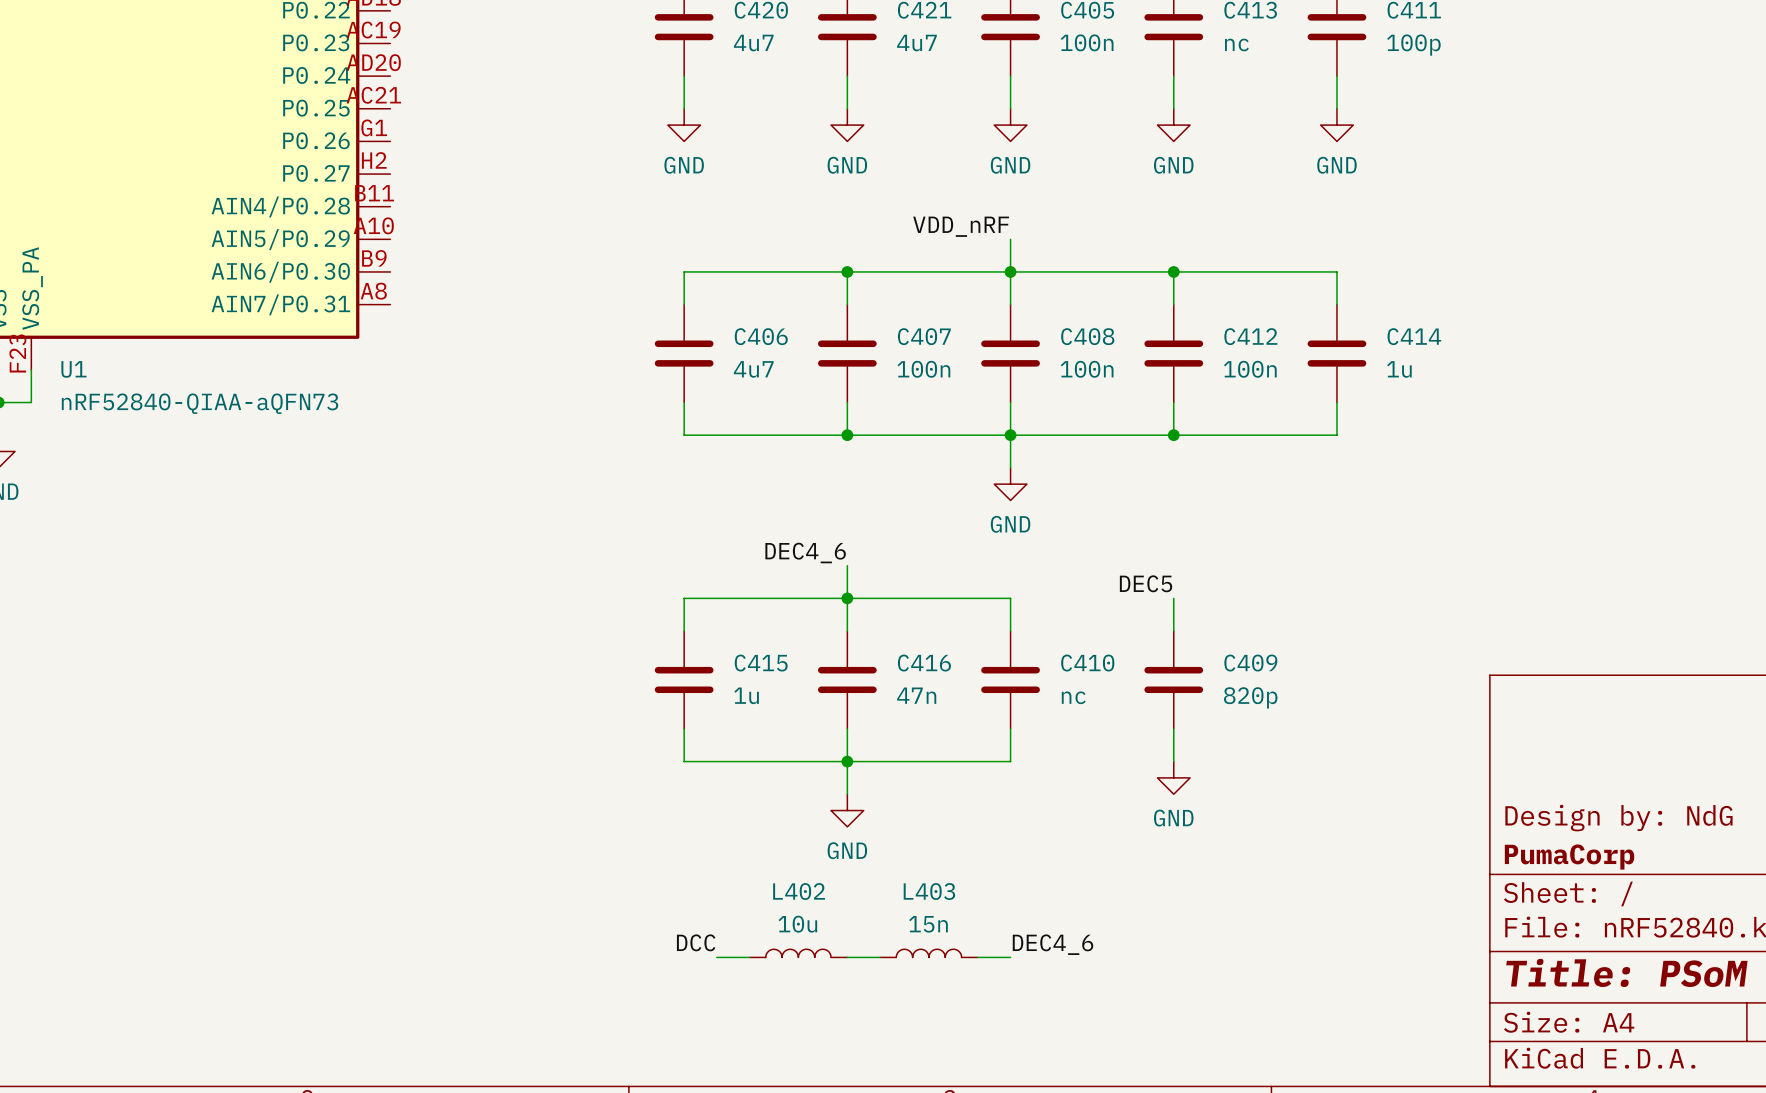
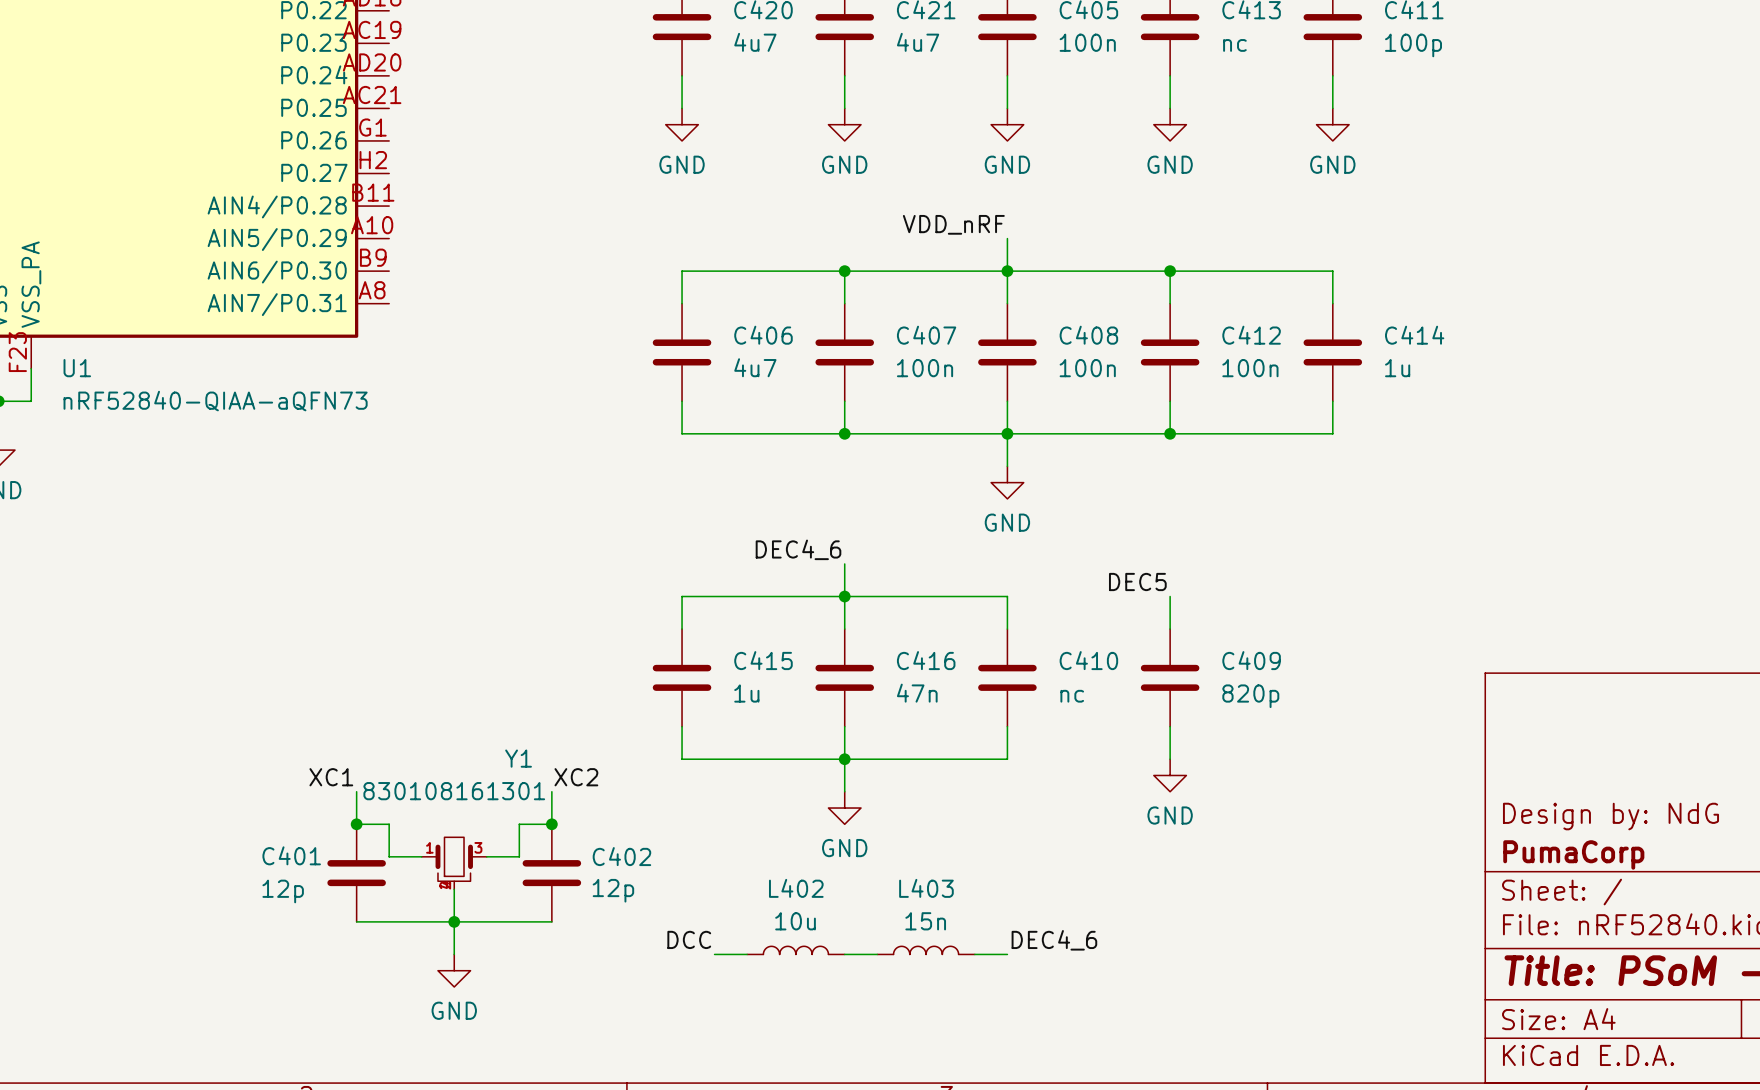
label: none -> XC1 (331, 777)
label: none -> XC2 (576, 777)
wire: none -> (356, 791) (356, 824) (389, 824) (389, 856) (421, 856)
wire: none -> (551, 791) (551, 824) (519, 824) (519, 856) (486, 856)
junction: none -> (356, 824)
junction: none -> (551, 824)
Y1: none -> 830108161301 (454, 863)
C401: none -> 12p (356, 873)
C402: none -> 12p (551, 873)
wire: none -> (454, 889) (454, 954)
wire: none -> (356, 921) (551, 921)
junction: none -> (454, 921)
power symbol: none -> GND (454, 970)

